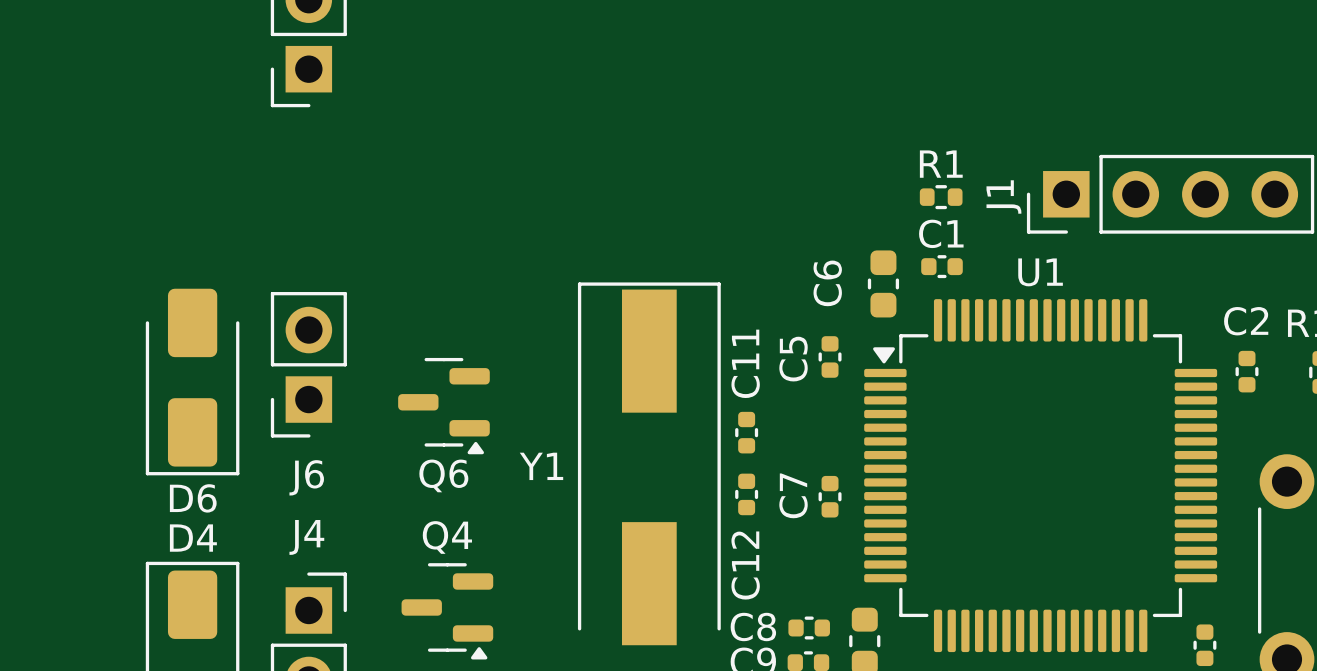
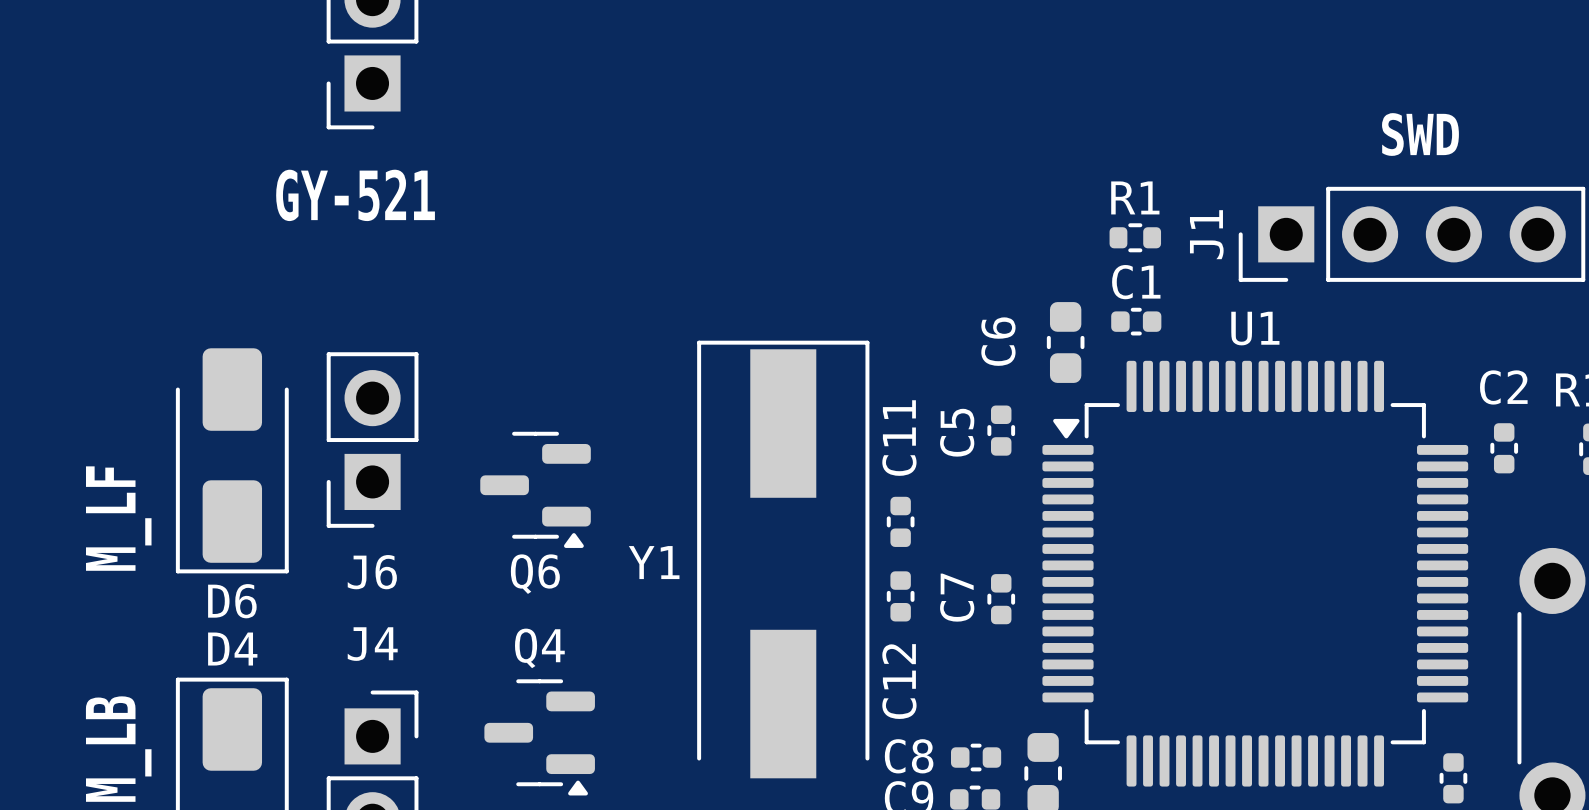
text: none -> SWD (1420, 134)
text: none -> GY-521 (355, 195)
text: none -> M_LF (118, 518)
text: none -> M_LB (118, 749)

